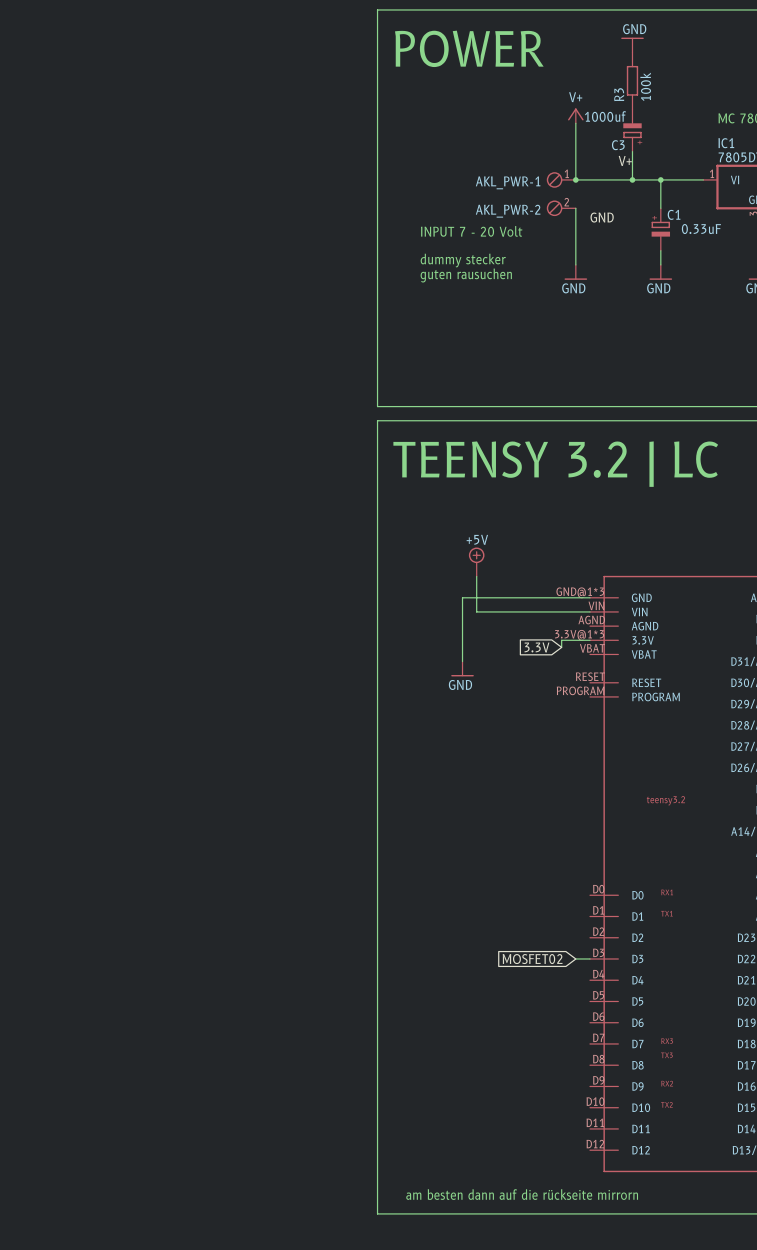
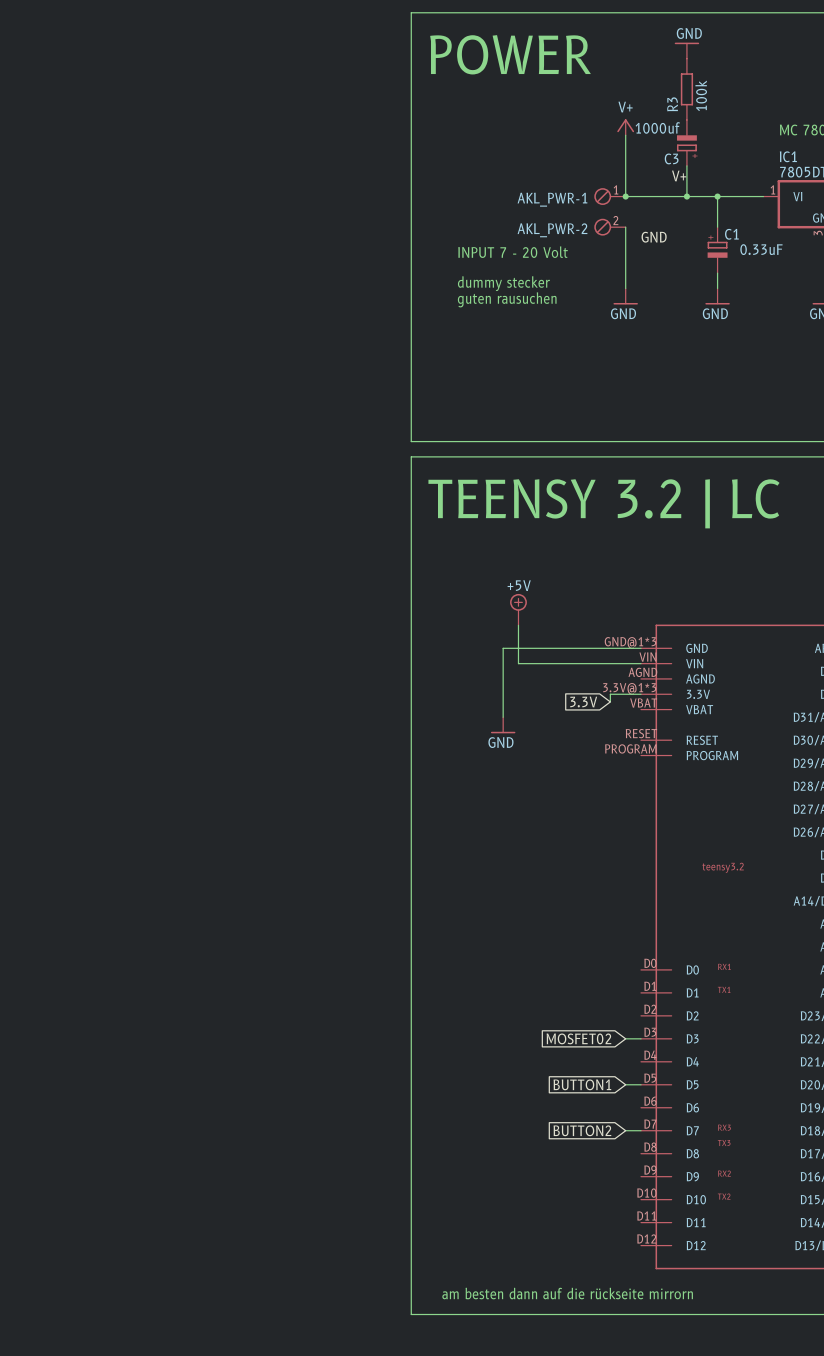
global label: none -> BUTTON1 (582, 1084)
wire: none -> (625, 1084) (640, 1084)
wire: none -> (625, 1130) (640, 1130)
global label: none -> BUTTON2 (582, 1130)

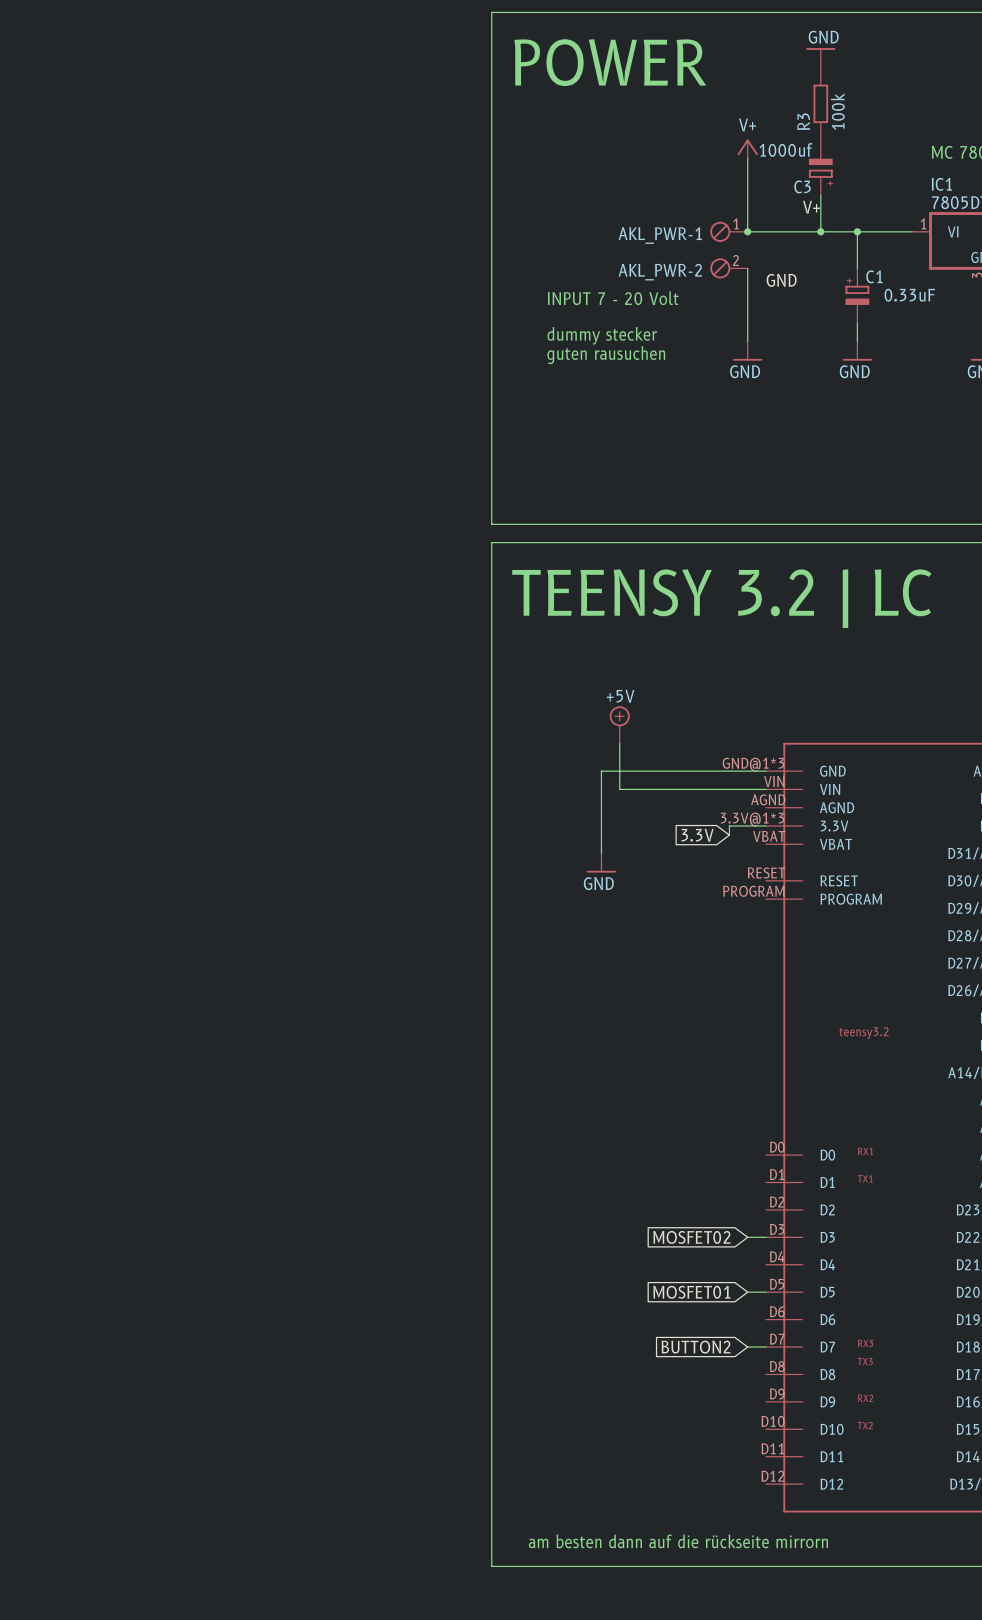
global label: BUTTON1 (582, 1084) -> MOSFET01 (691, 1292)

